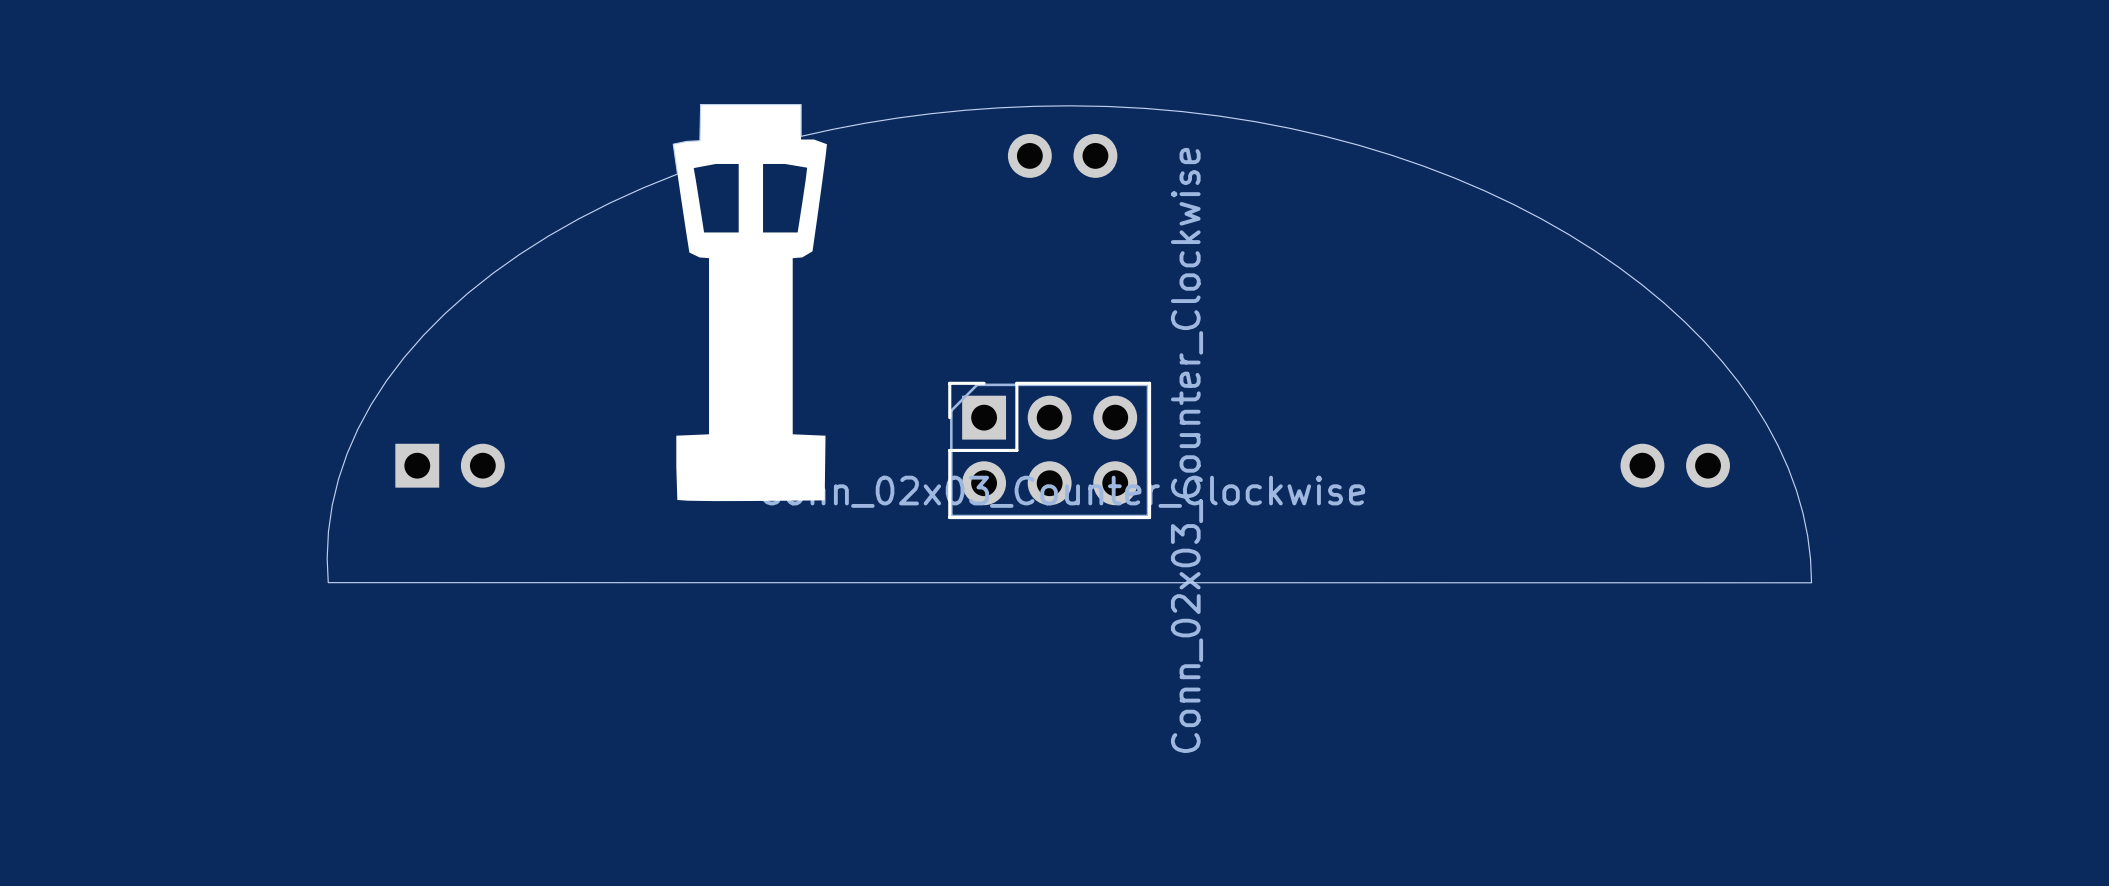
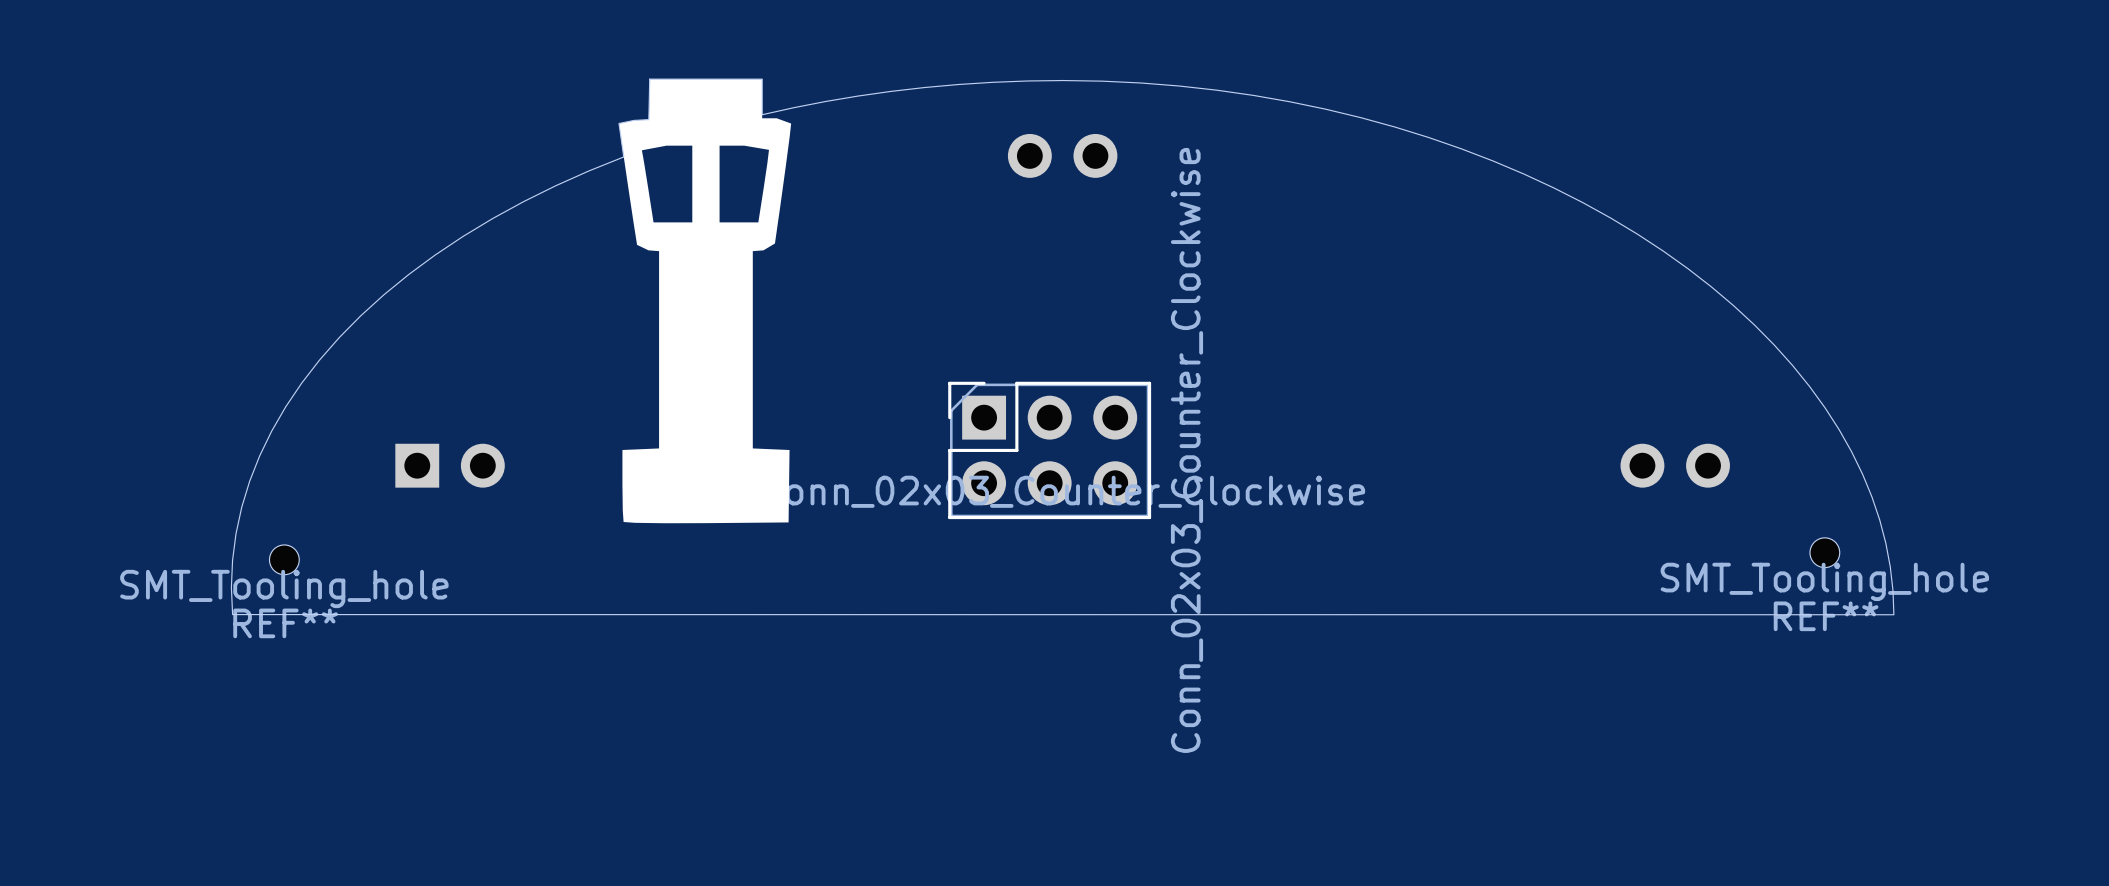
drawing shape: [327, 104, 1812, 583] -> [231, 79, 1894, 615]
REF**: none -> SMT_Tooling_hole (1824, 552)
REF**: none -> SMT_Tooling_hole (284, 559)

